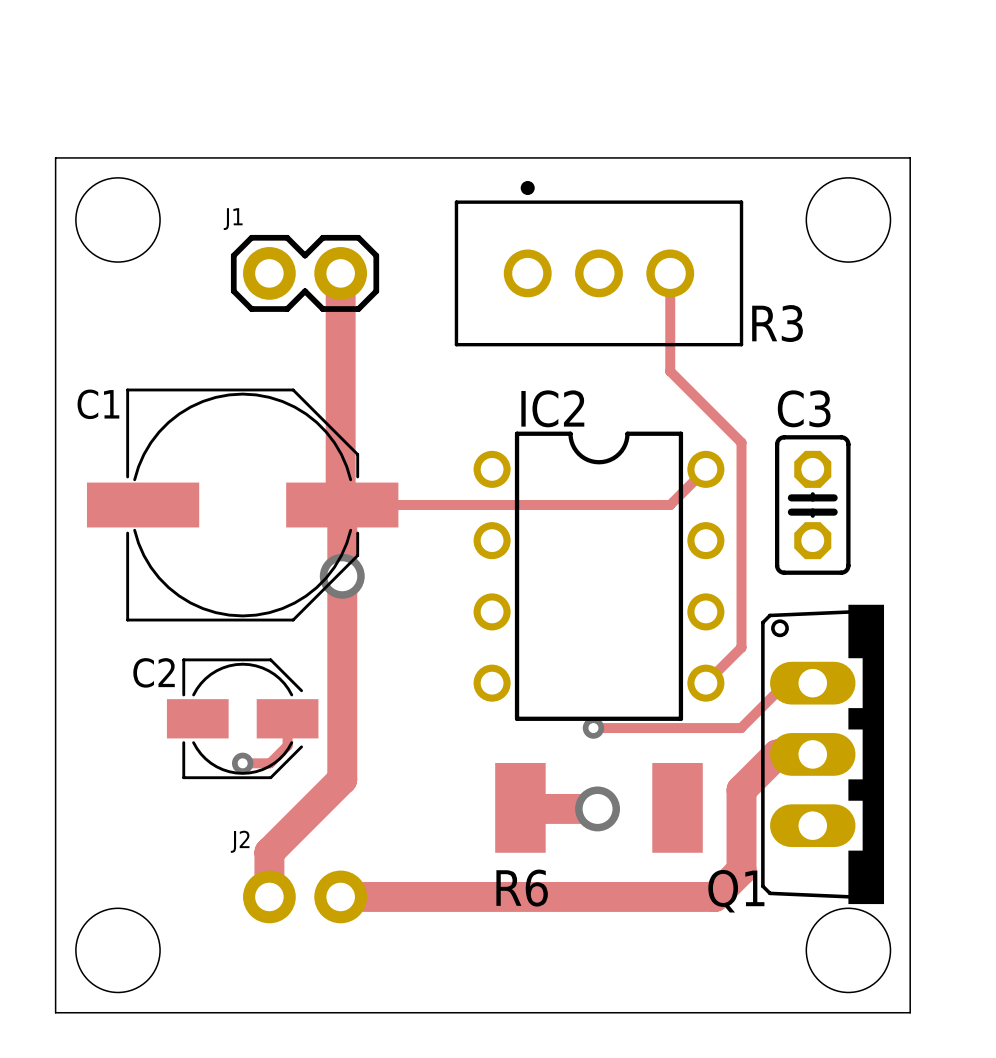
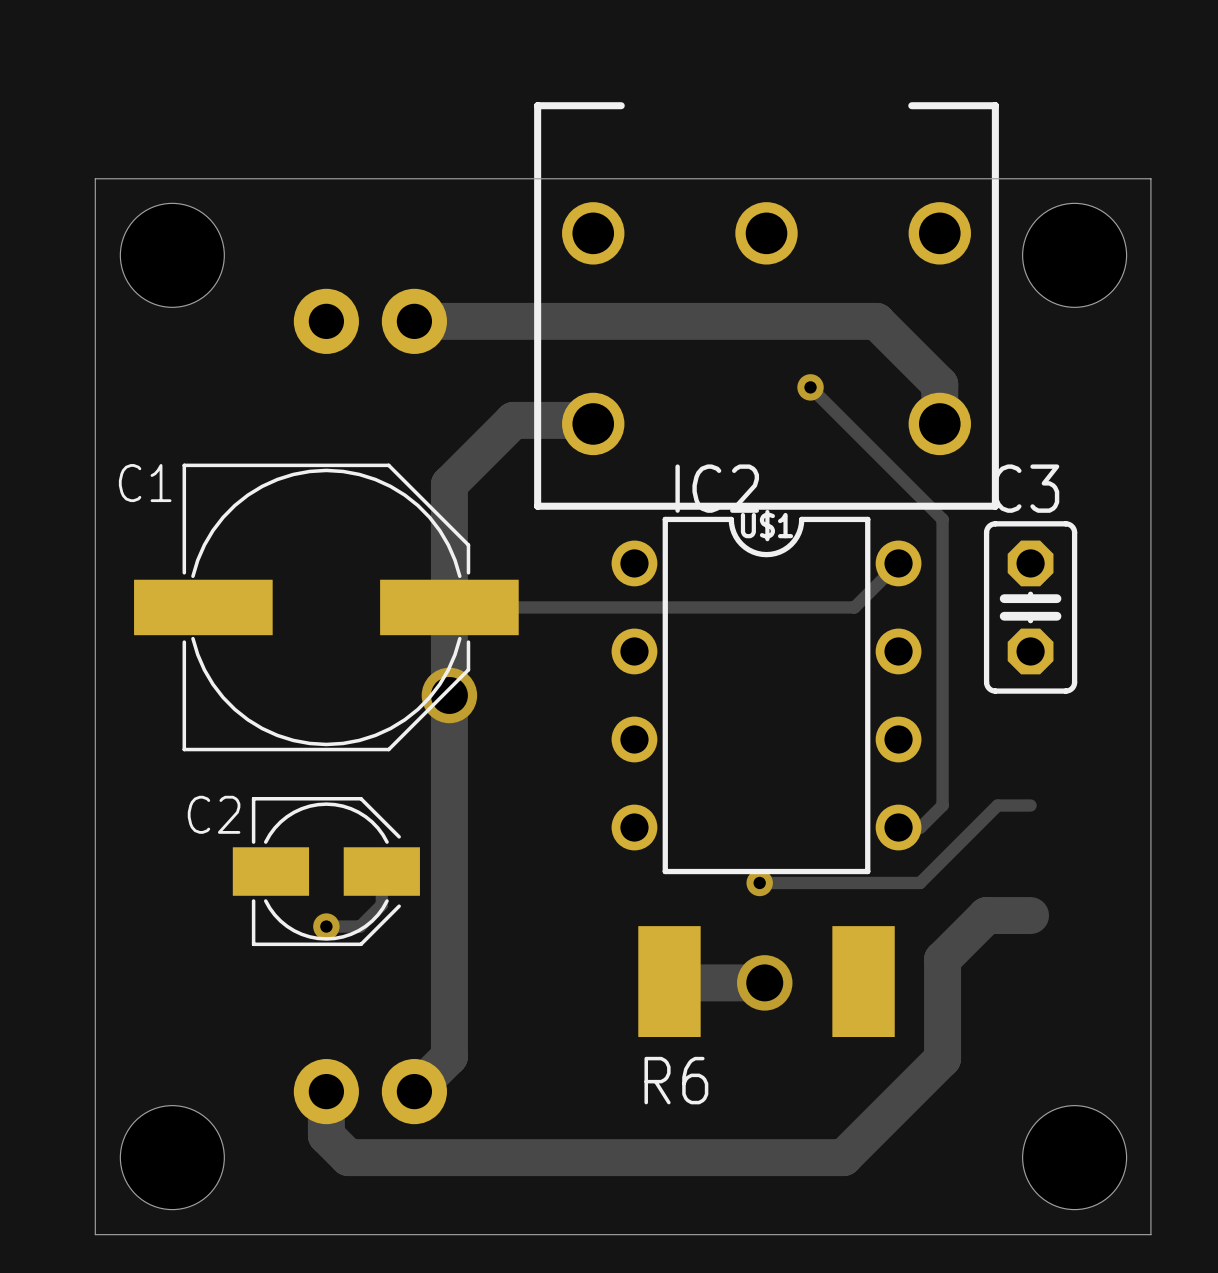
U$1: none -> (766, 305)
R3: (598, 263) -> none
part: none -> (370, 321)
J1: (305, 273) -> none
track: none -> (414, 321) (876, 321) (939, 384) (939, 423)
track: (340, 273) (340, 503) -> none
track: (670, 273) (670, 371) (741, 442) -> (810, 387) (942, 519) (942, 530)
via: none -> (810, 387)
track: none -> (593, 423) (589, 420) (513, 420) (449, 484) (449, 607)
track: (741, 647) (705, 683) -> (942, 783) (942, 805) (920, 827) (899, 827)
track: (812, 683) (786, 683) (741, 728) (723, 728) -> (1030, 805) (997, 805) (920, 882)
Q1: (822, 754) -> none
track: (342, 779) (269, 852) (269, 896) -> (449, 946) (449, 1056) (414, 1091)
J2 name: J2 (240, 841) -> none
J2 position: (305, 896) -> (370, 1091)
track: (340, 896) (714, 896) -> (326, 1091) (326, 1135) (348, 1157) (843, 1157) (909, 1091)

